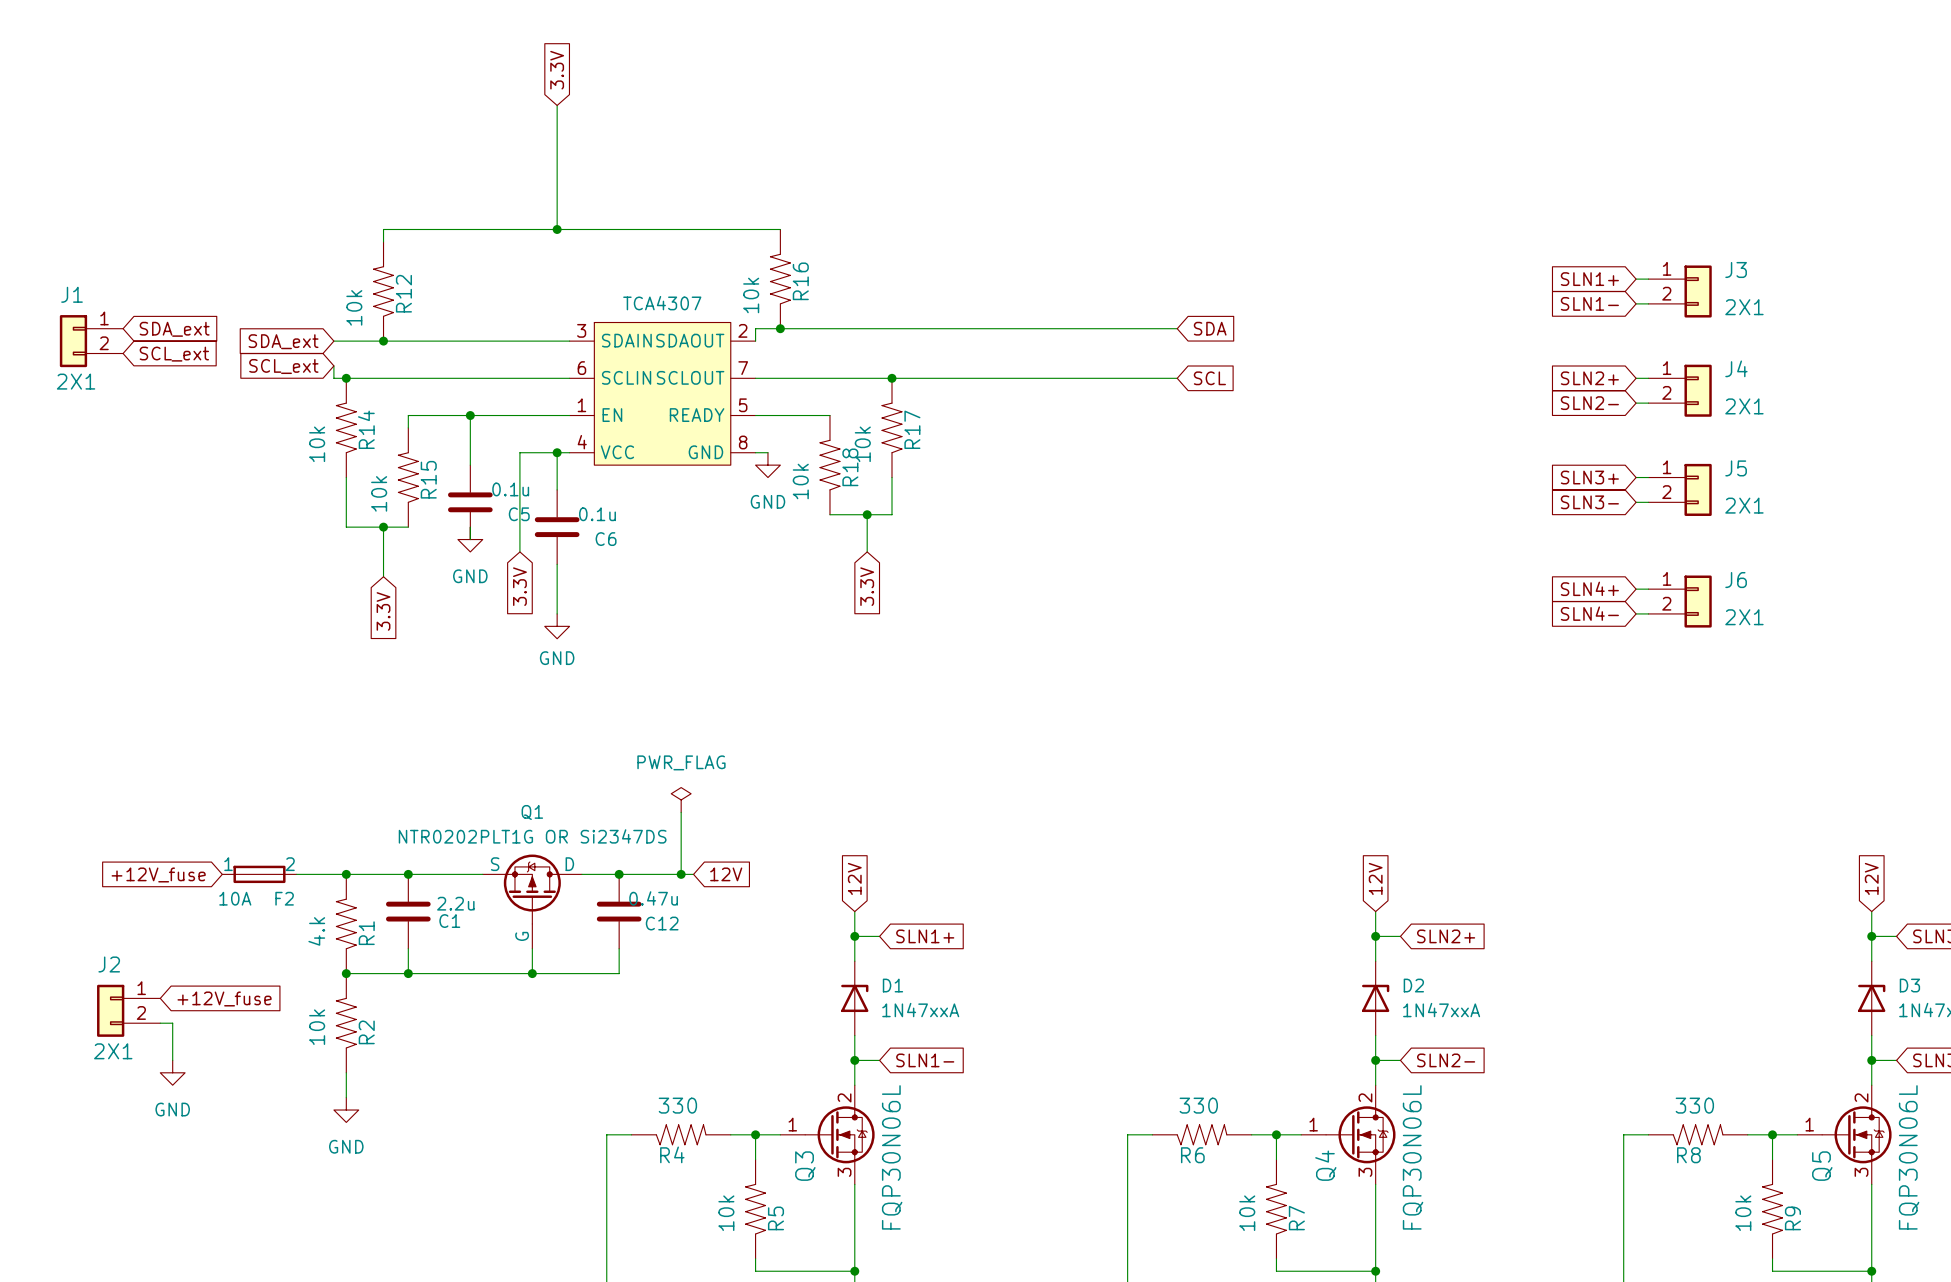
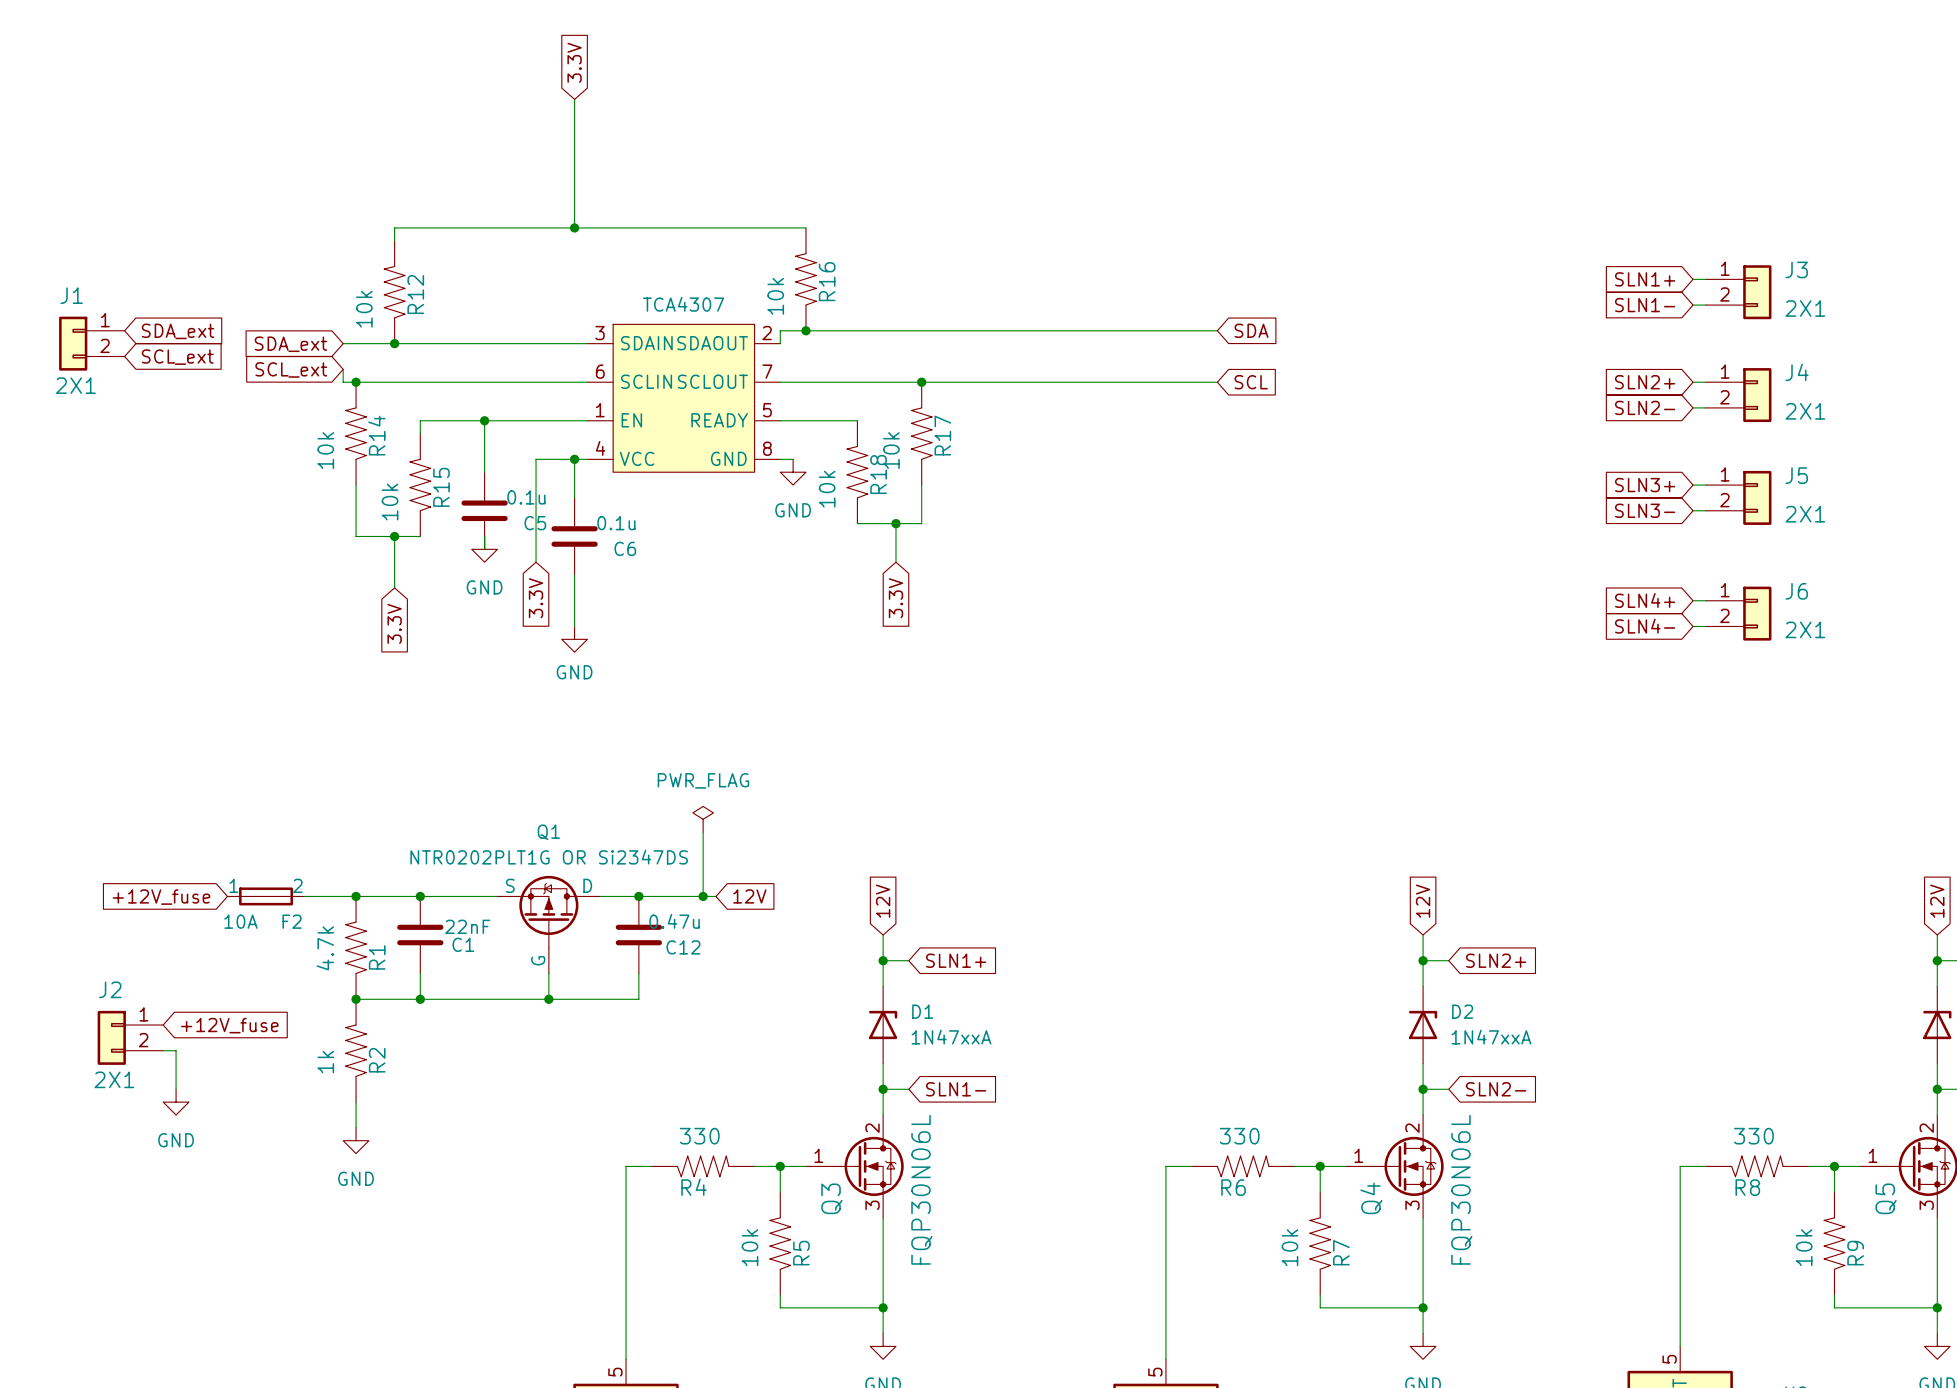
C1 value: 2.2u (455, 903) -> 22nF (467, 926)
R1 value: 4.k (316, 931) -> 4.7k (325, 948)
R2 value: 10k (317, 1027) -> 1k (325, 1062)

